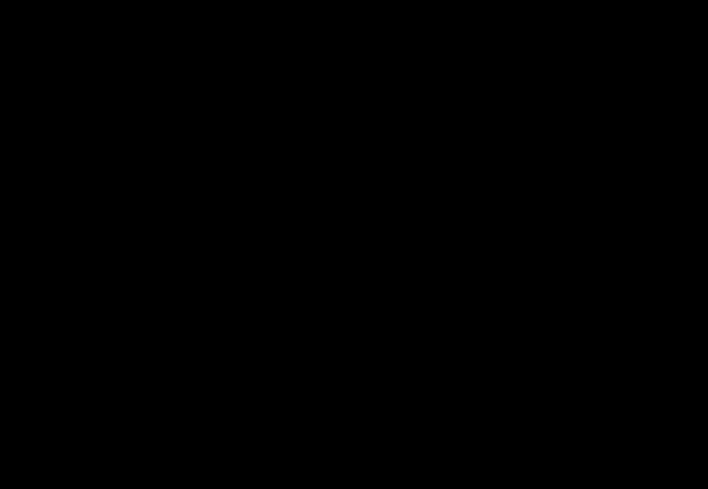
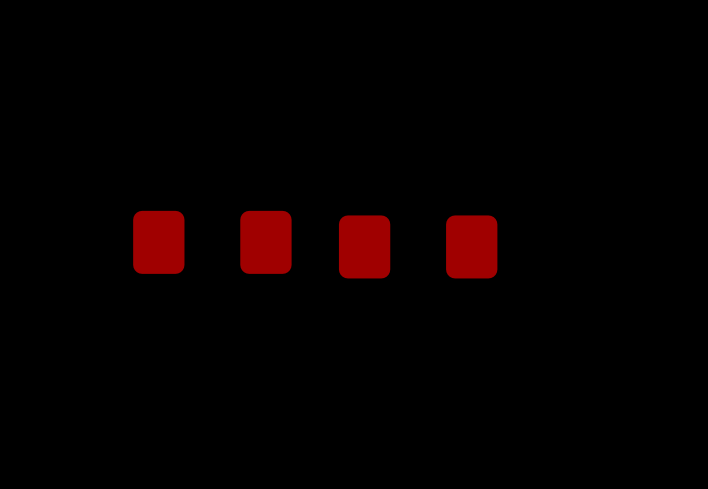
part: none -> (212, 242)
part: none -> (418, 246)

